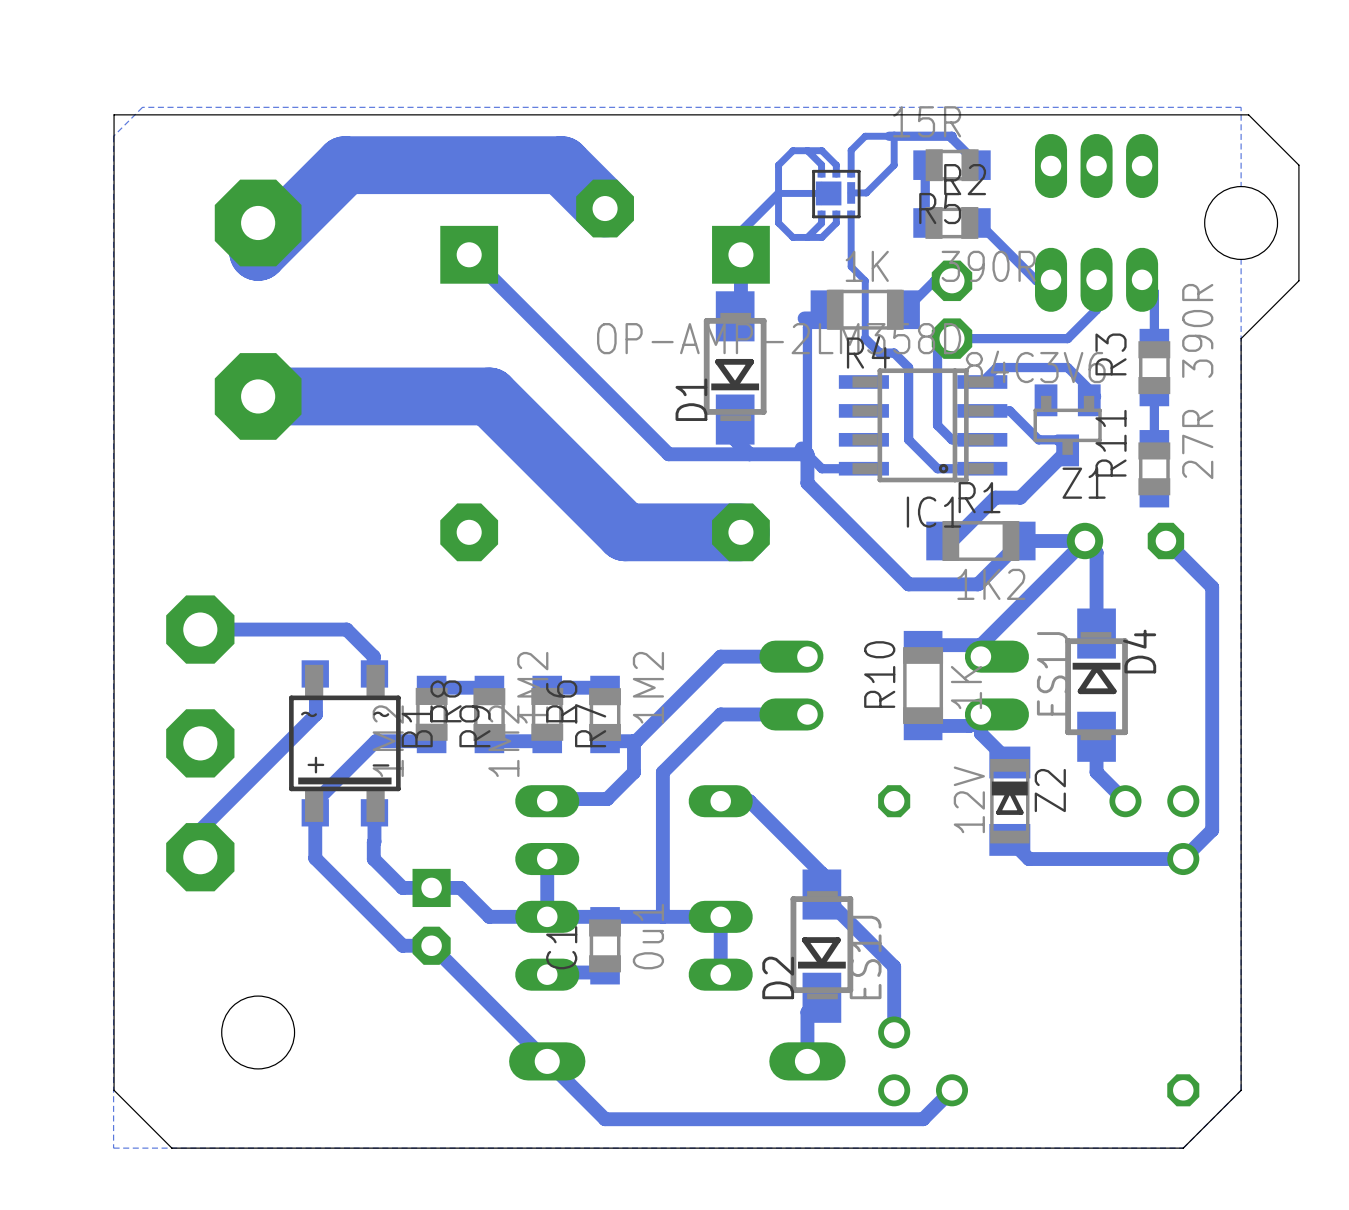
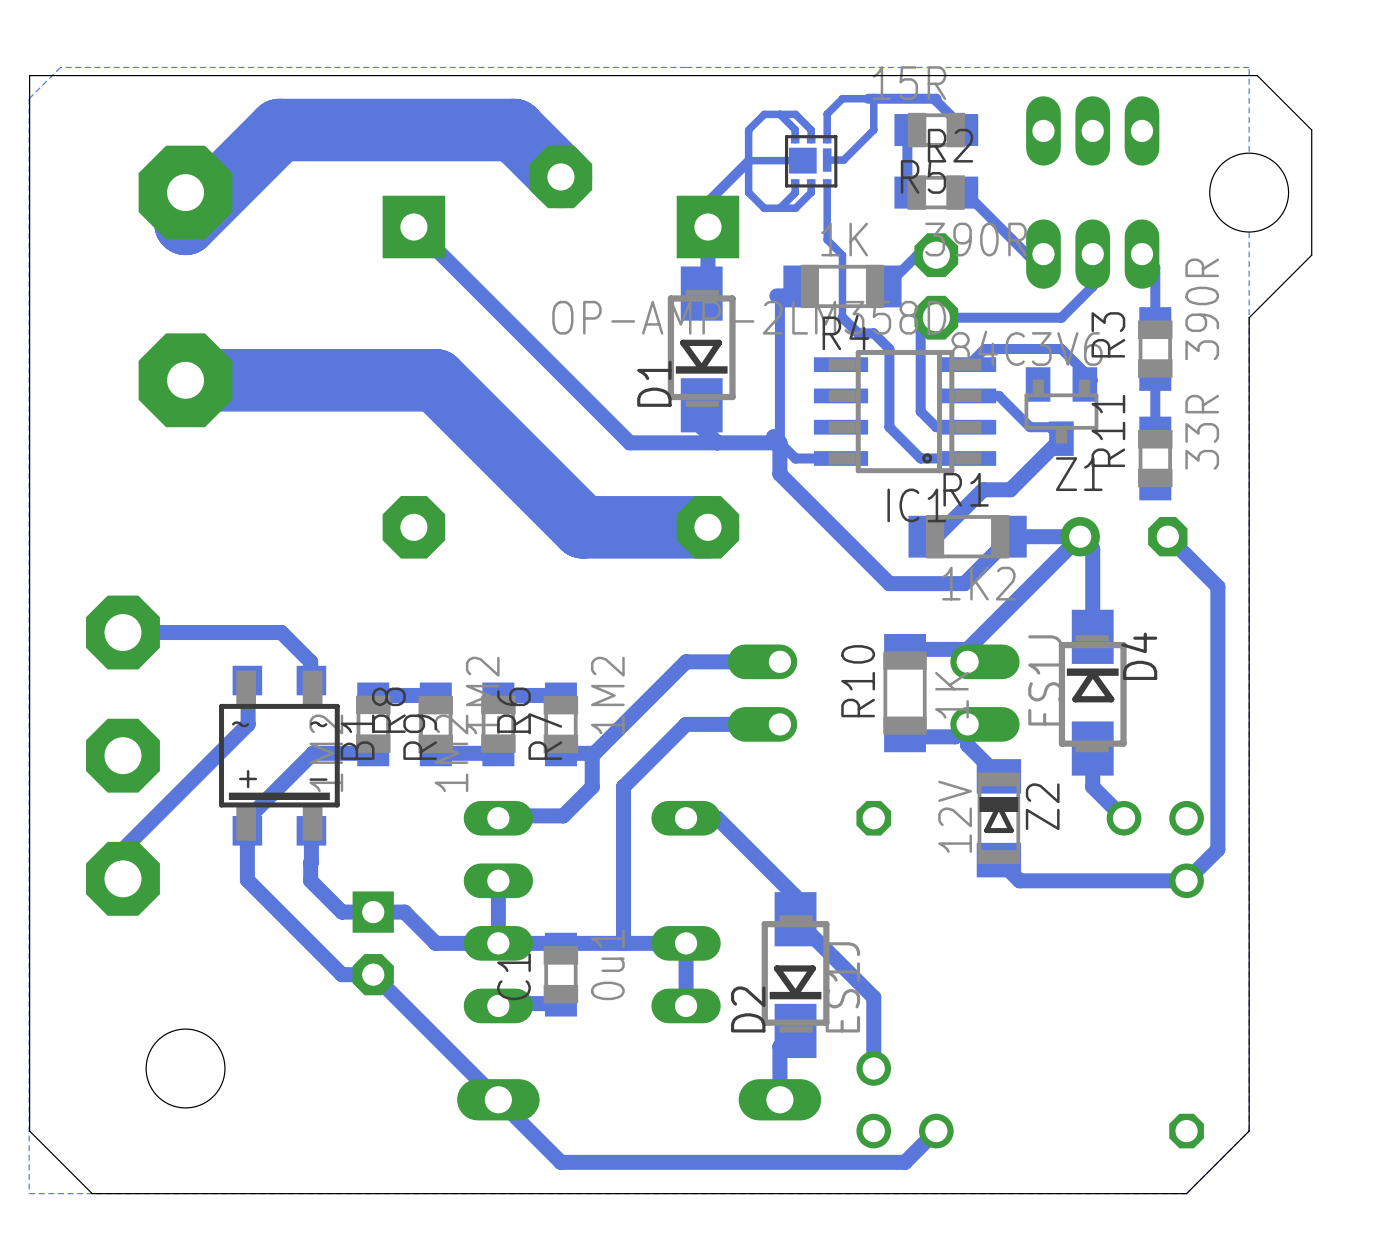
R11 value: 27R (1197, 444) -> 33R (1202, 432)

